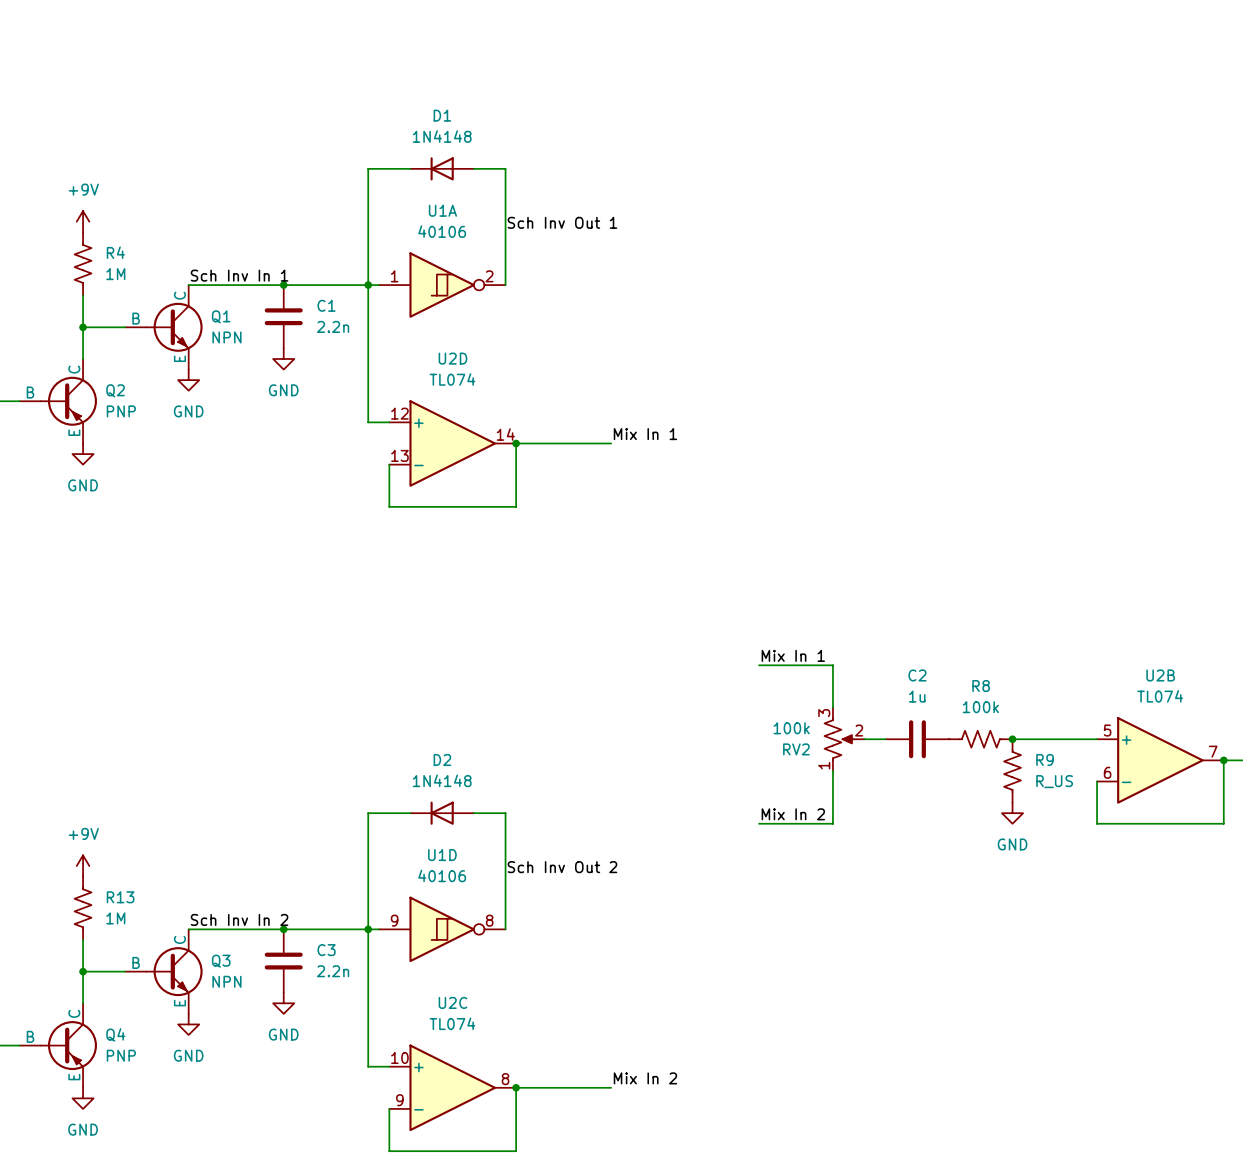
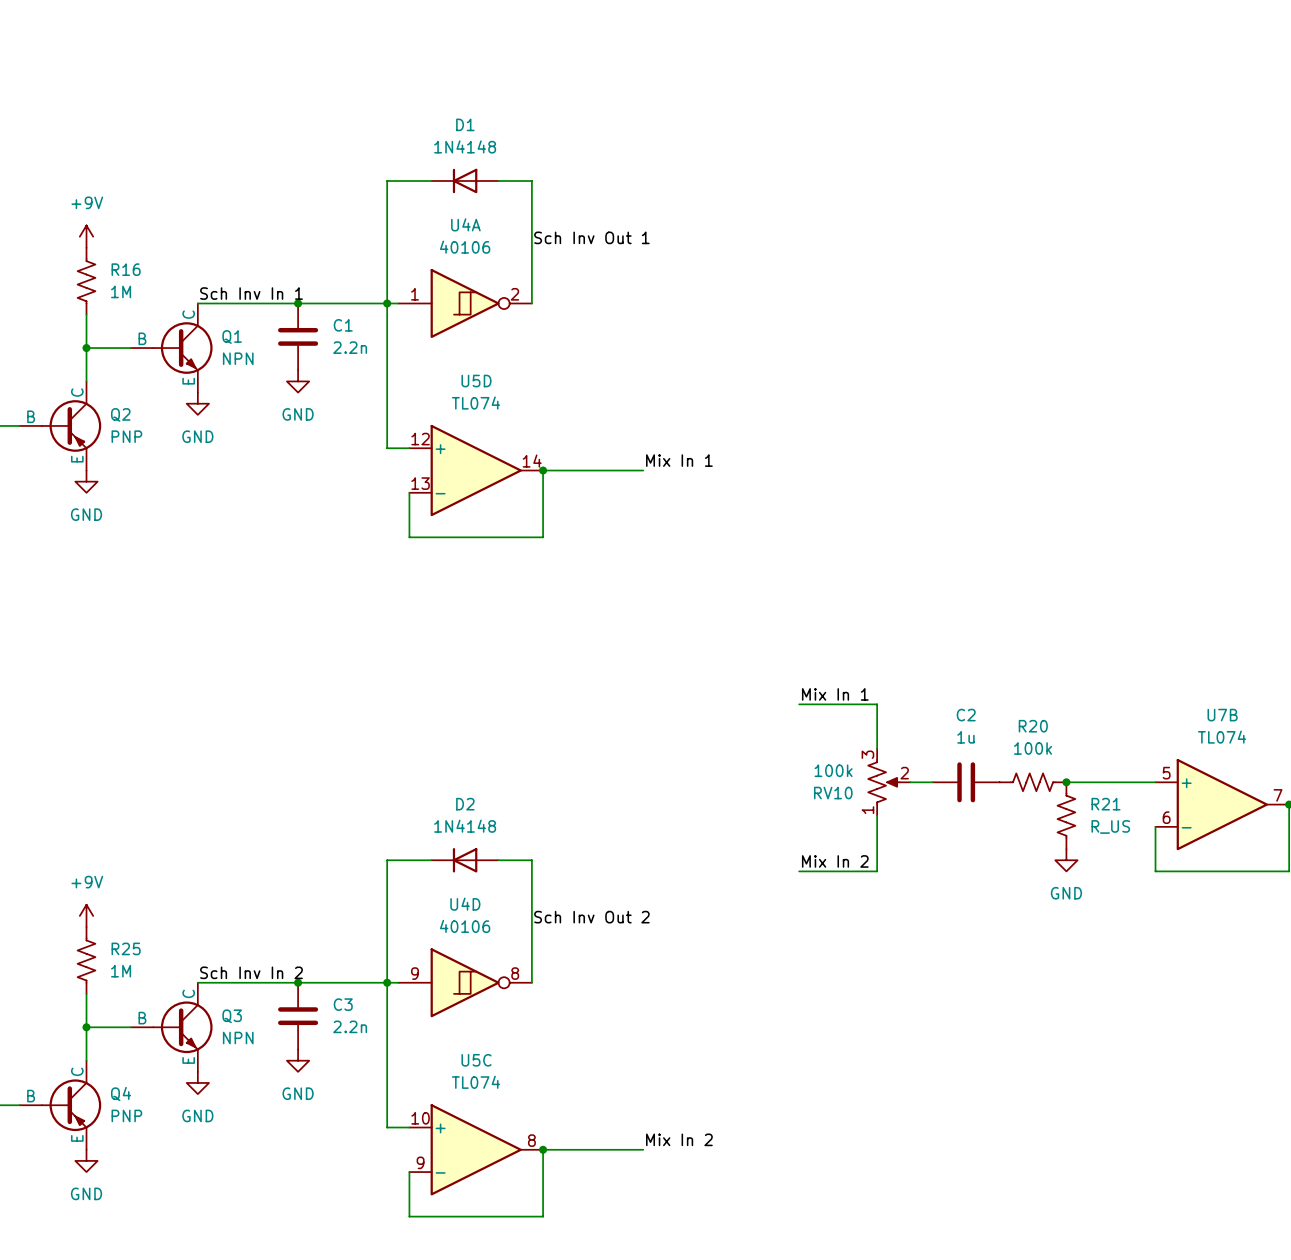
U1A name: U1A (442, 210) -> U4A (465, 224)
R4 name: R4 (115, 252) -> R16 (126, 269)
U2D name: U2D (452, 358) -> U5D (476, 381)
U2B name: U2B (1160, 675) -> U7B (1222, 715)
R8 name: R8 (981, 686) -> R20 (1033, 726)
RV2 name: RV2 (796, 749) -> RV10 (833, 793)
R9 name: R9 (1045, 759) -> R21 (1106, 804)
U1D name: U1D (442, 855) -> U4D (465, 904)
R13 name: R13 (120, 897) -> R25 (126, 948)
U2C name: U2C (452, 1002) -> U5C (476, 1060)

